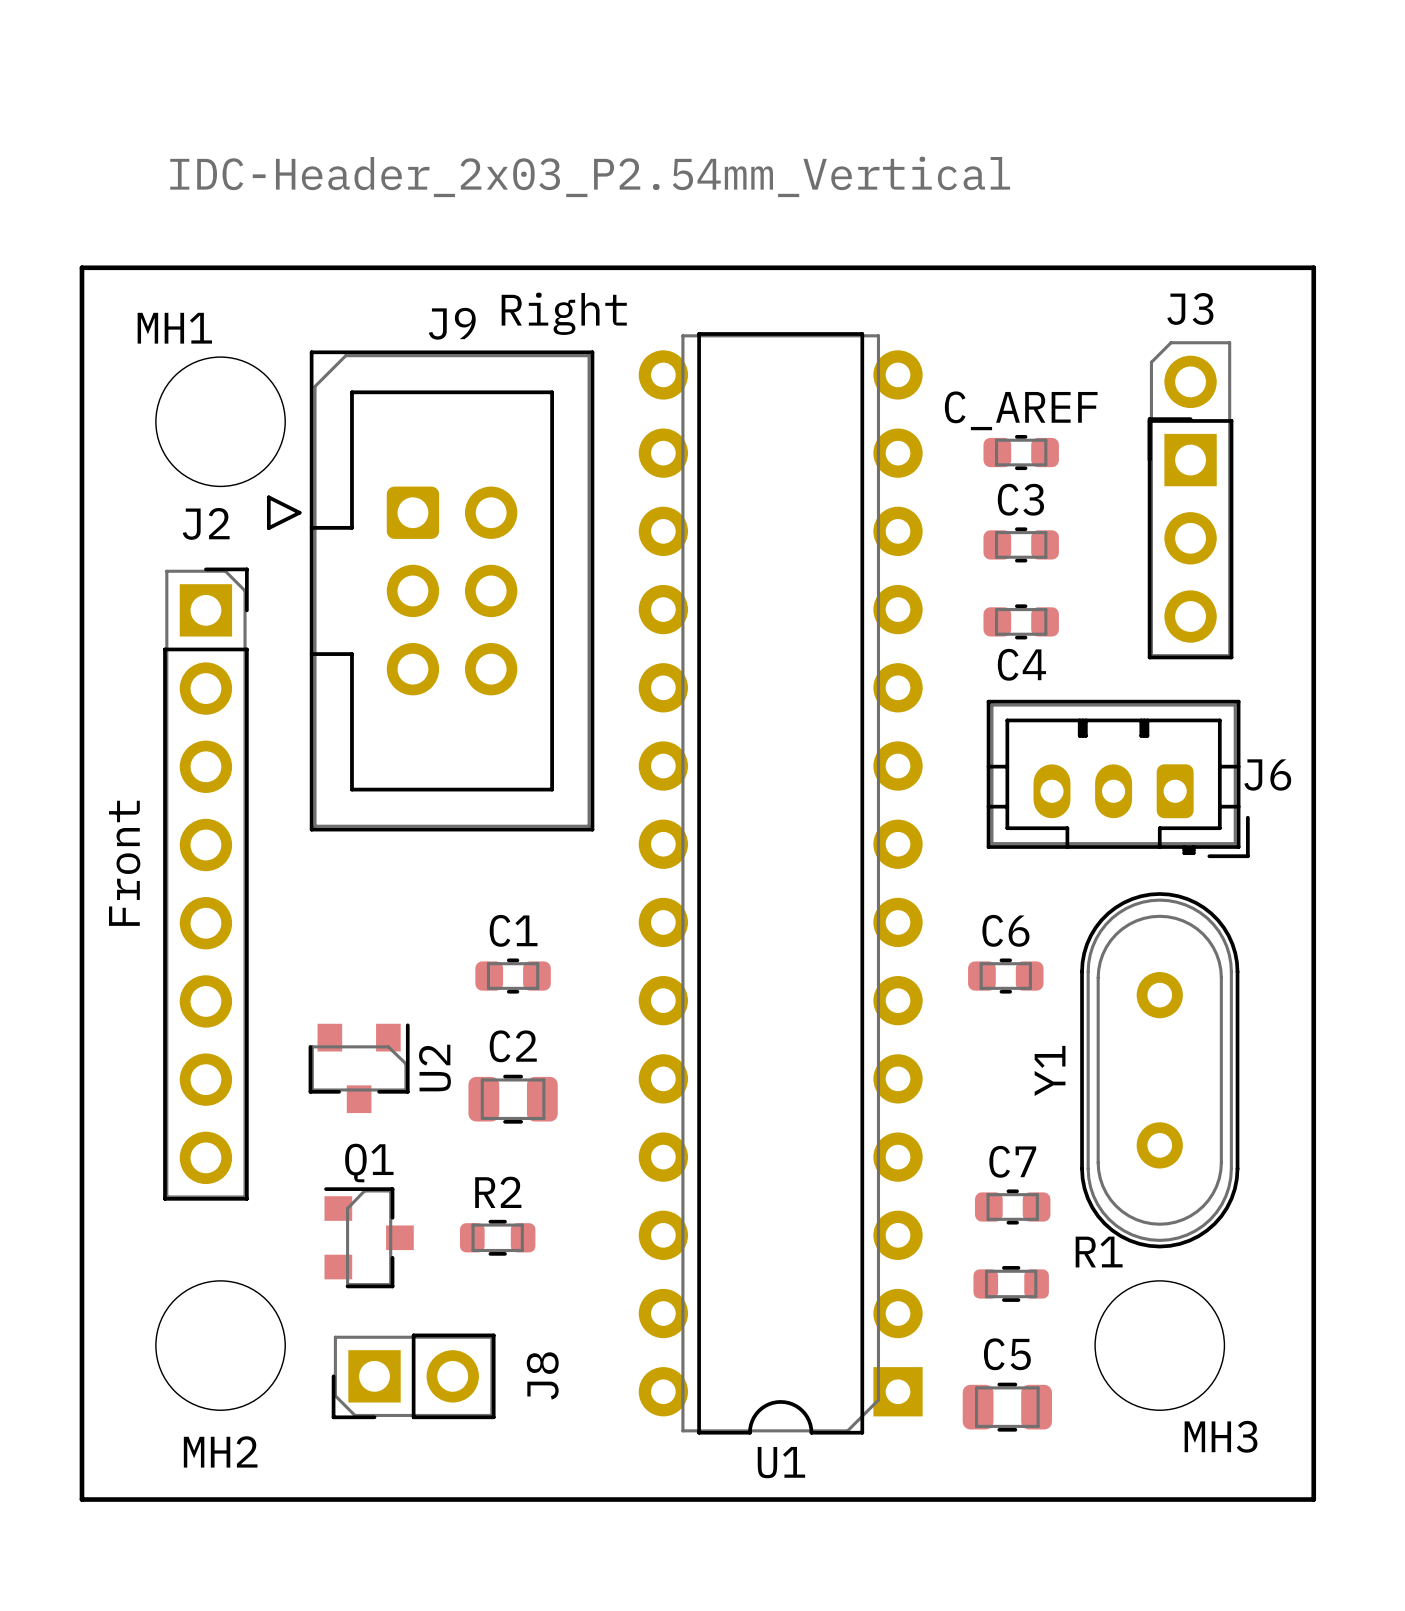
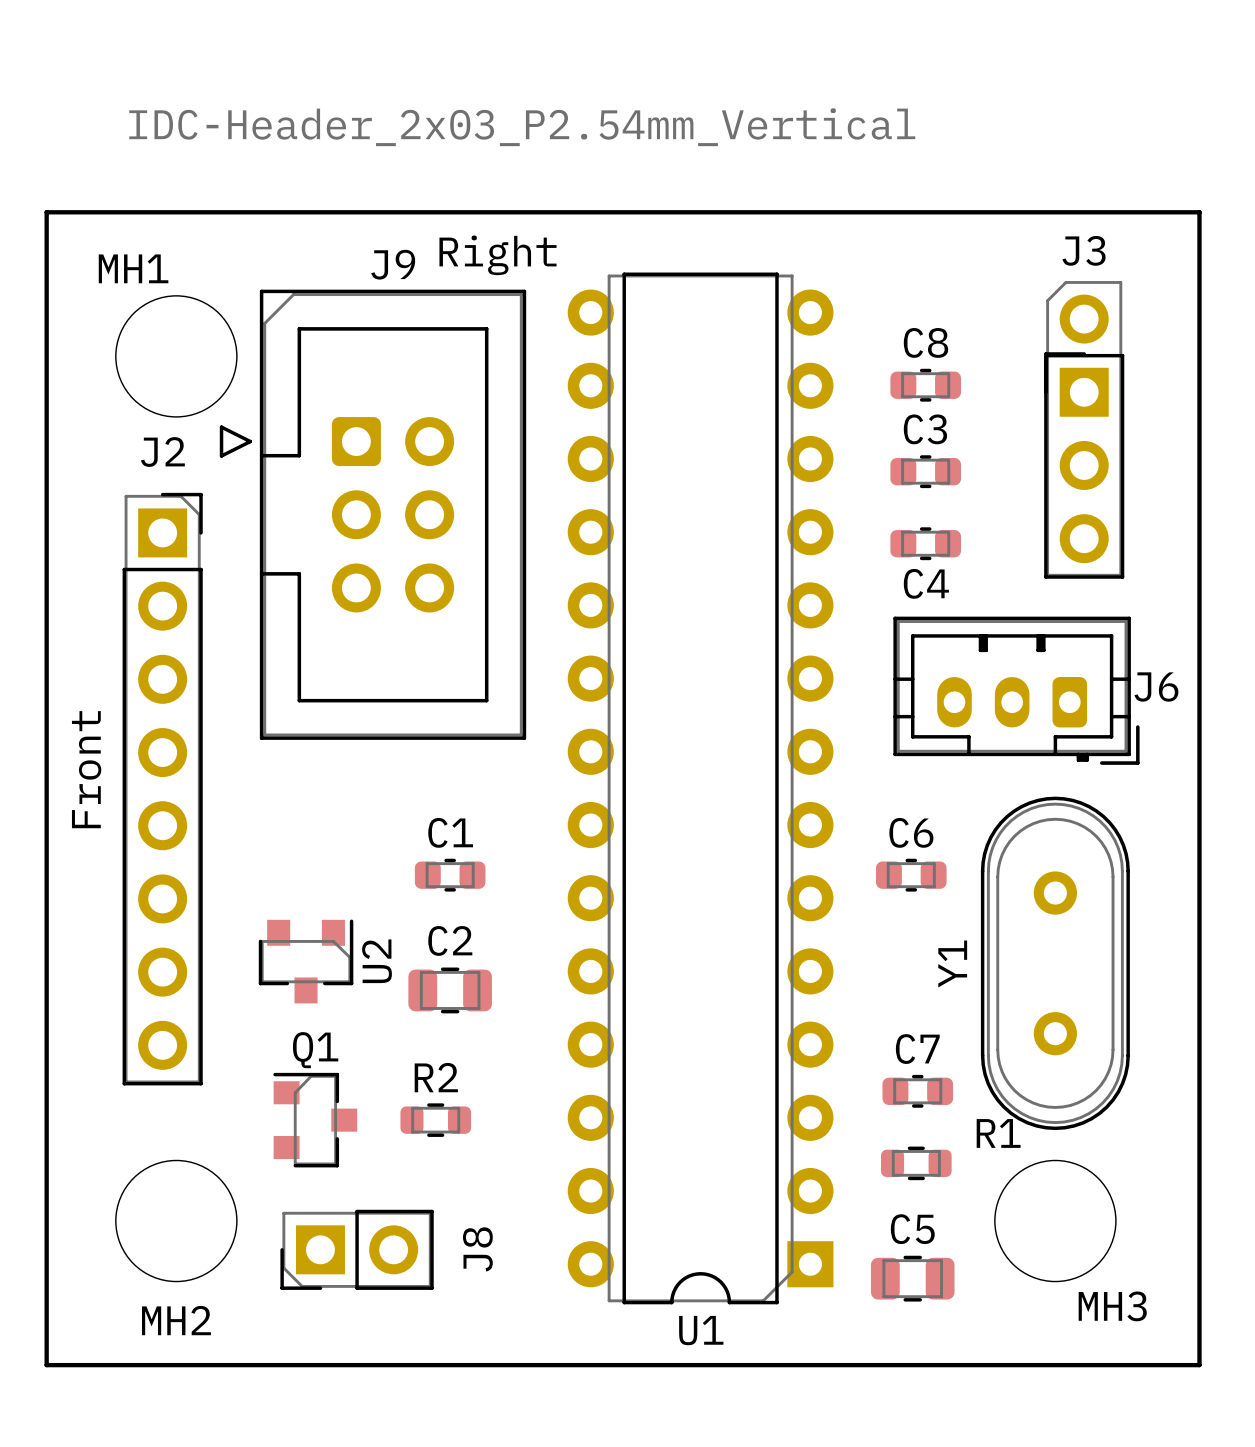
C_AREF name: C_AREF (1021, 410) -> C8 (926, 342)

